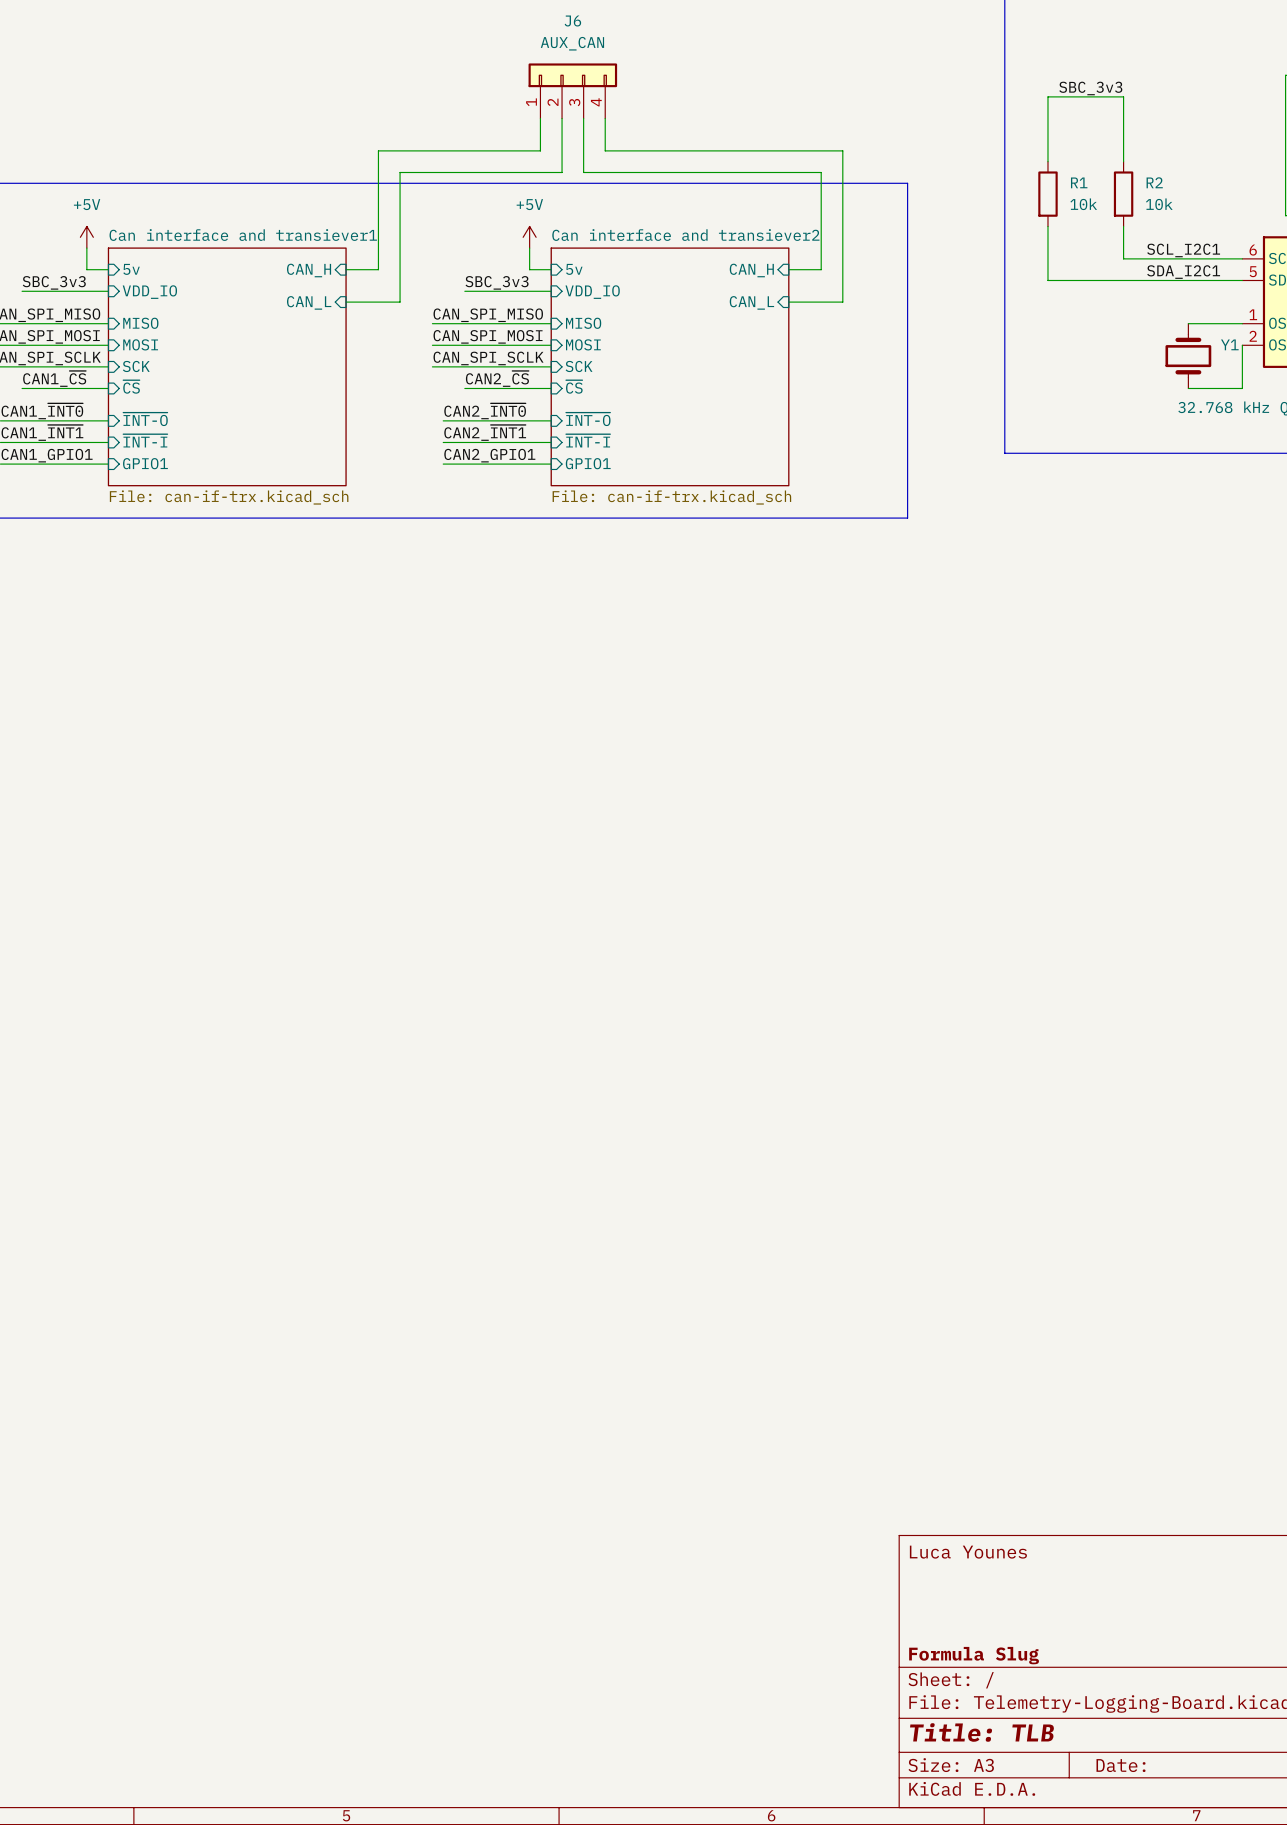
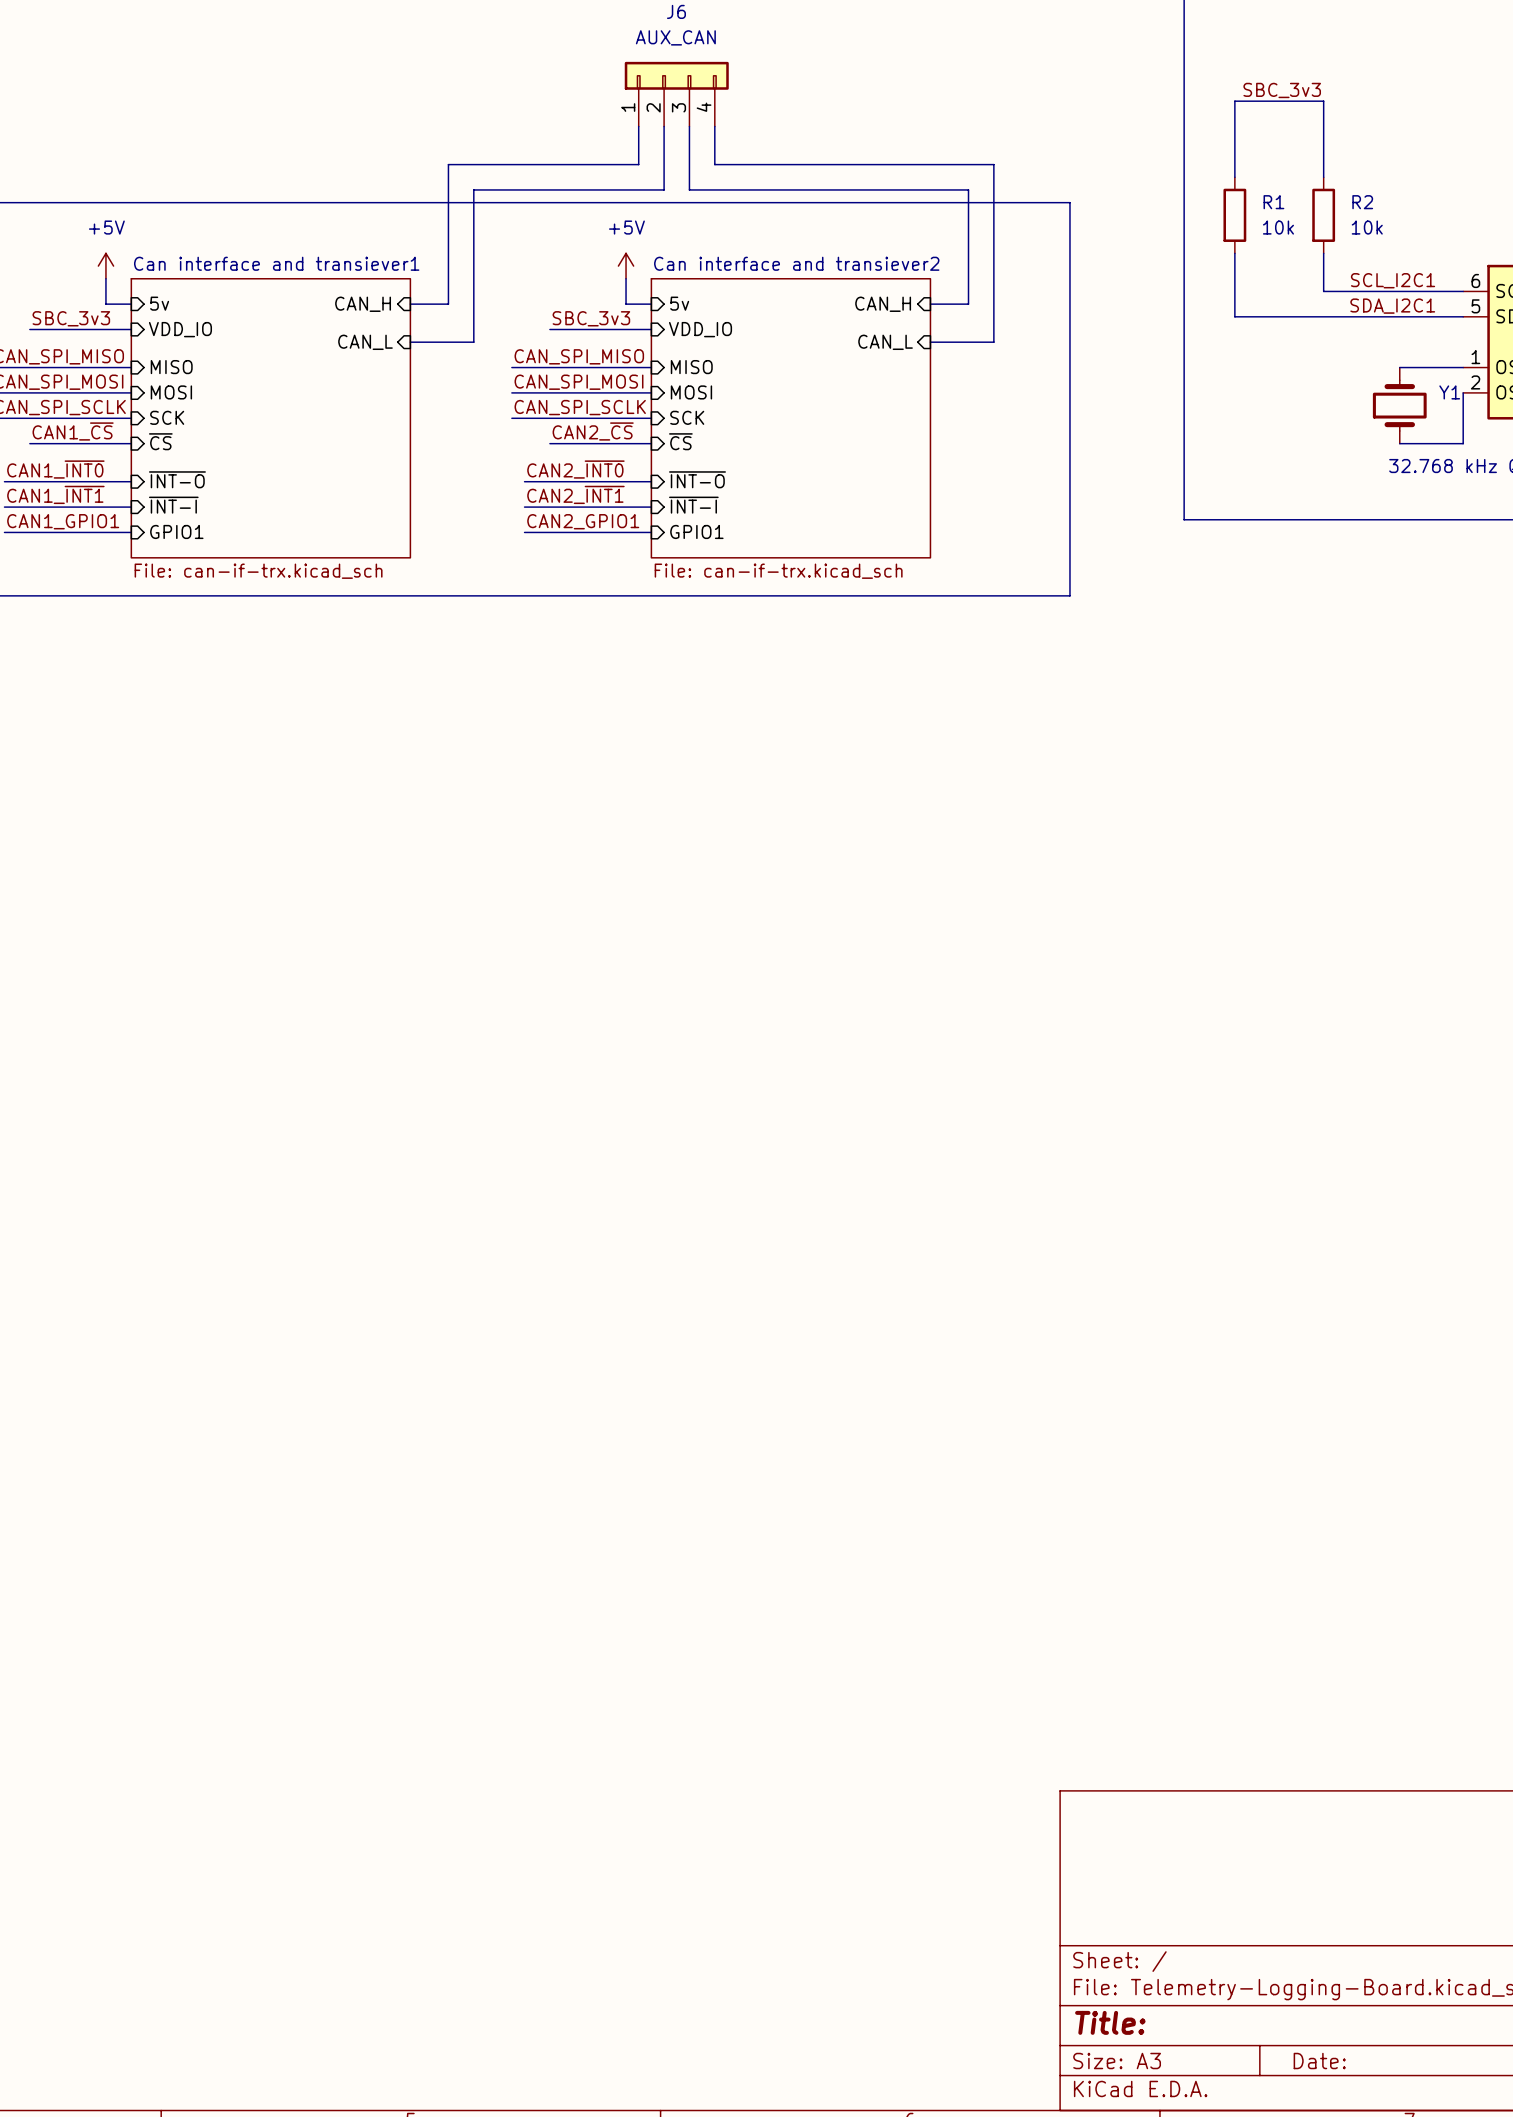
title block: Luca Younes (968, 1552) -> none
title block: Formula Slug (974, 1655) -> none
title block: Title: TLB (982, 1732) -> Title: (1110, 2022)

